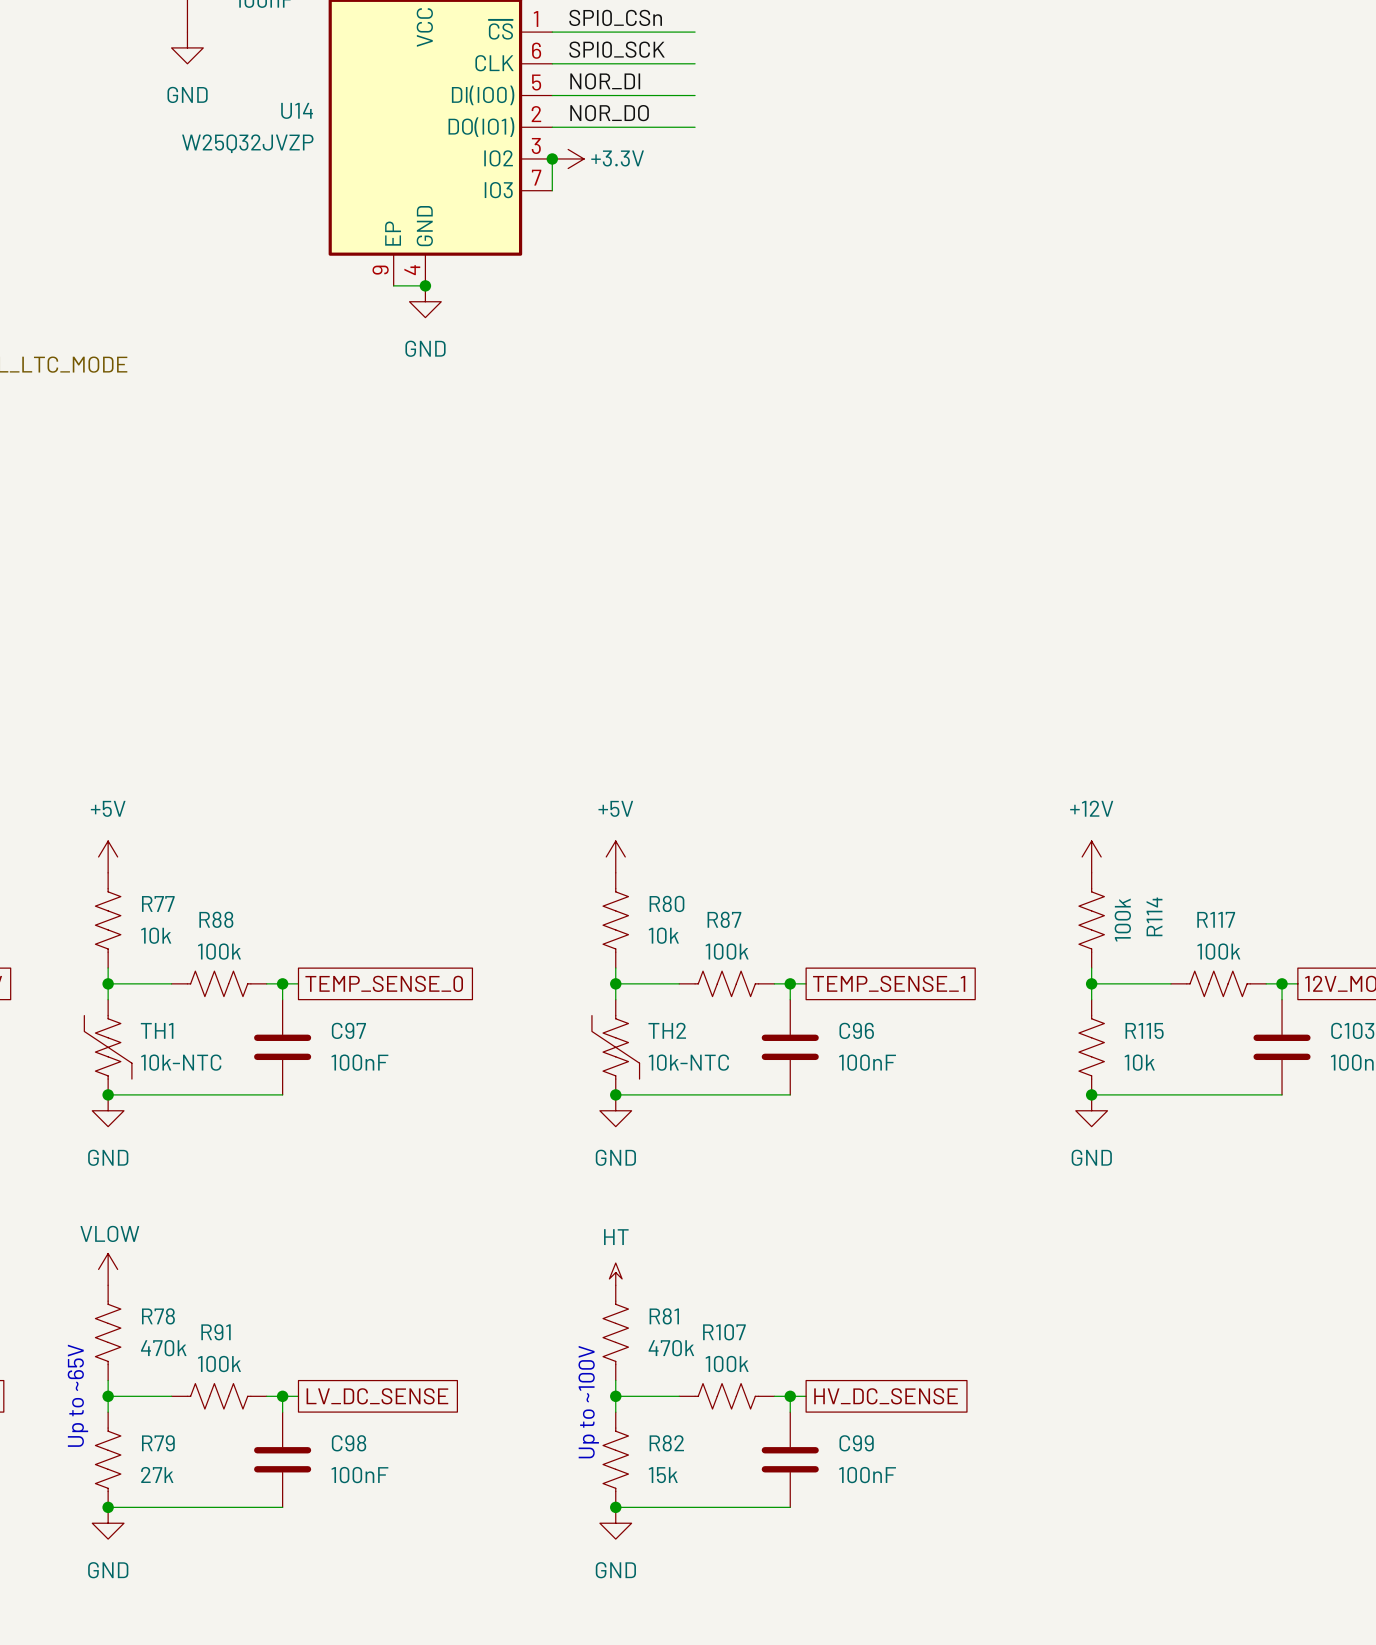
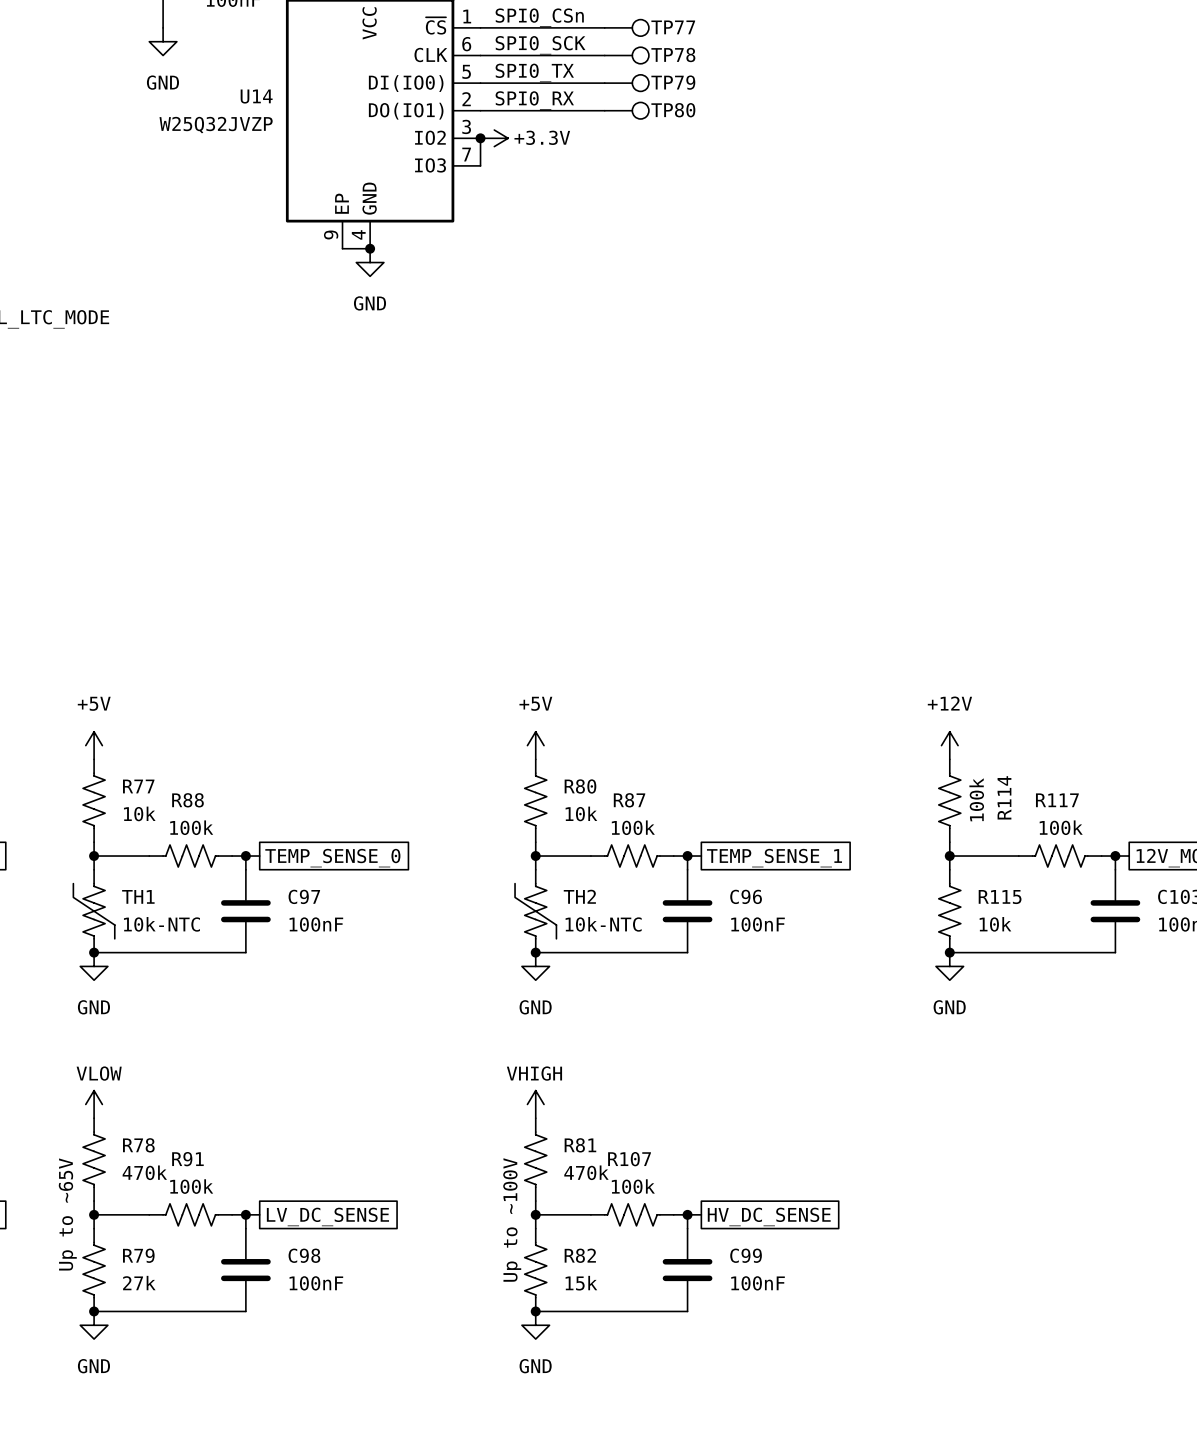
TP77: none -> (626, 27)
TP78: none -> (626, 55)
label: NOR_DI (605, 81) -> SPI0_TX (534, 72)
TP79: none -> (626, 83)
label: NOR_DO (609, 113) -> SPI0_RX (534, 100)
TP80: none -> (626, 110)
power symbol: HT (615, 1274) -> VHIGH (535, 1104)

